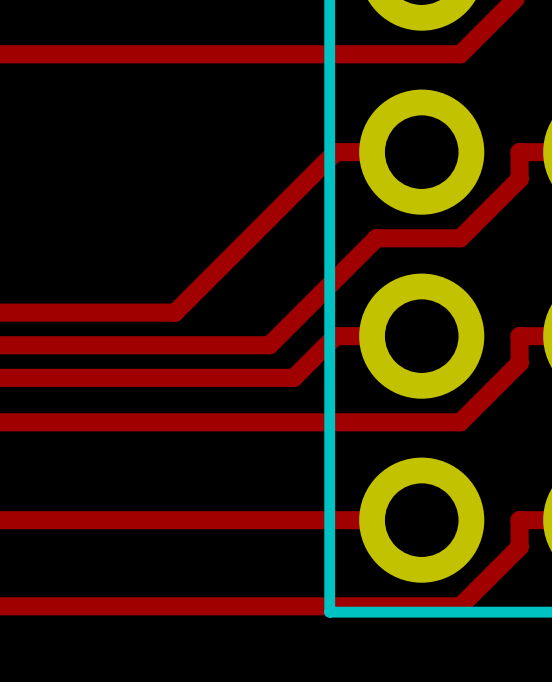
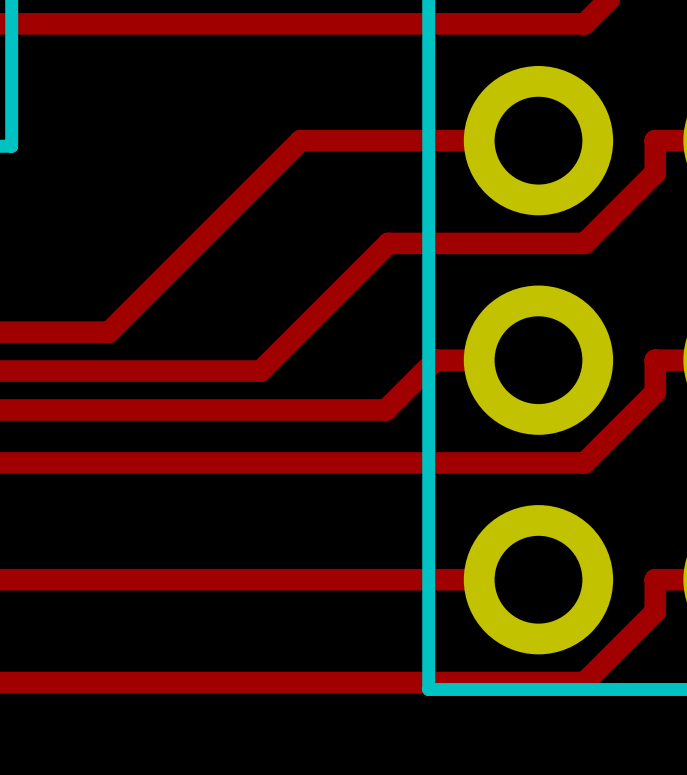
top track: (335, 152) (175, 312) (61, 312) -> (435, 140) (300, 140) (109, 332)
top track: (376, 238) (269, 345) (188, 345) -> (484, 243) (388, 243) (260, 371)

